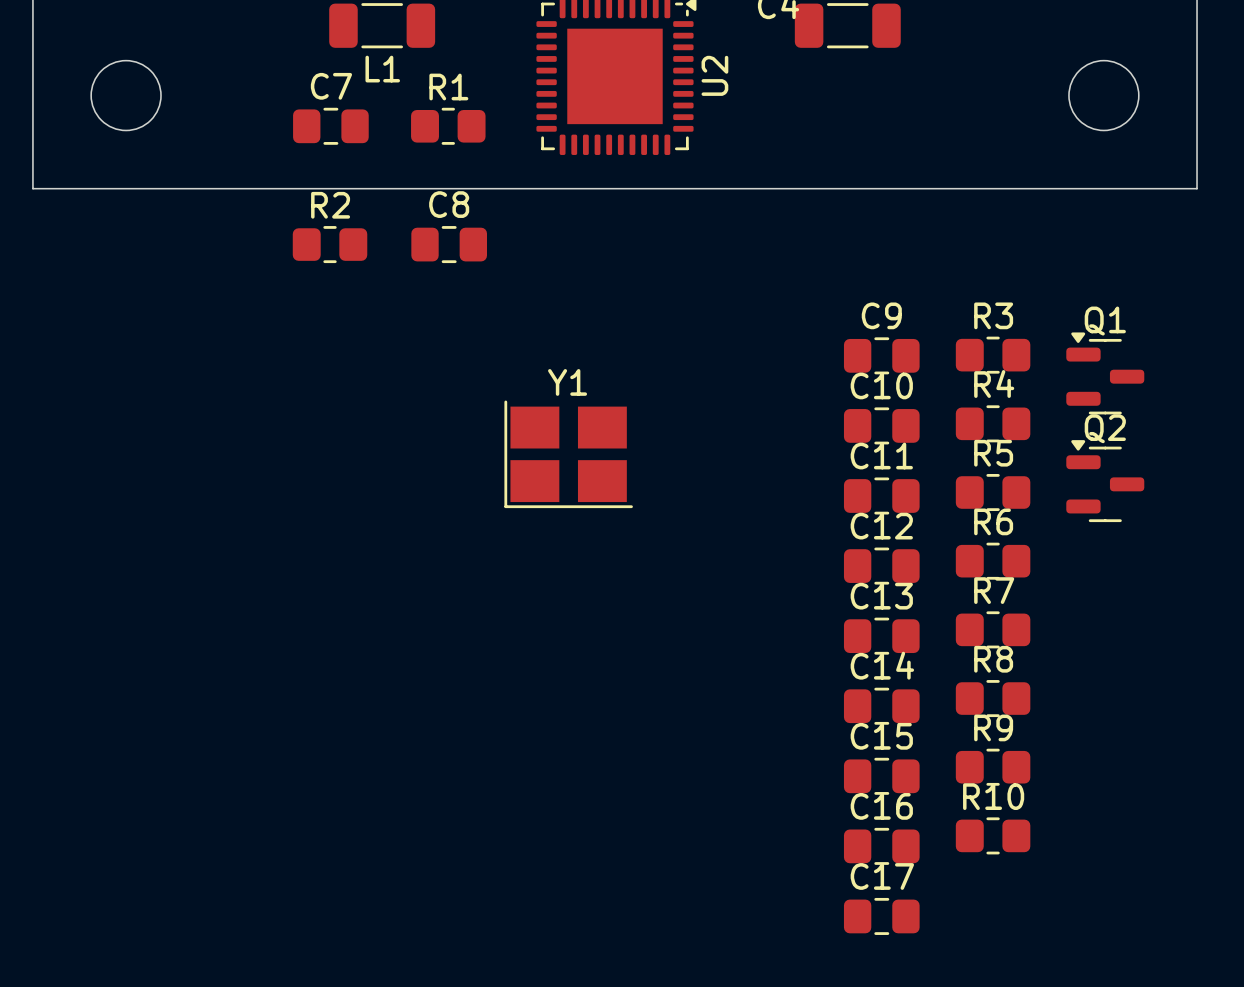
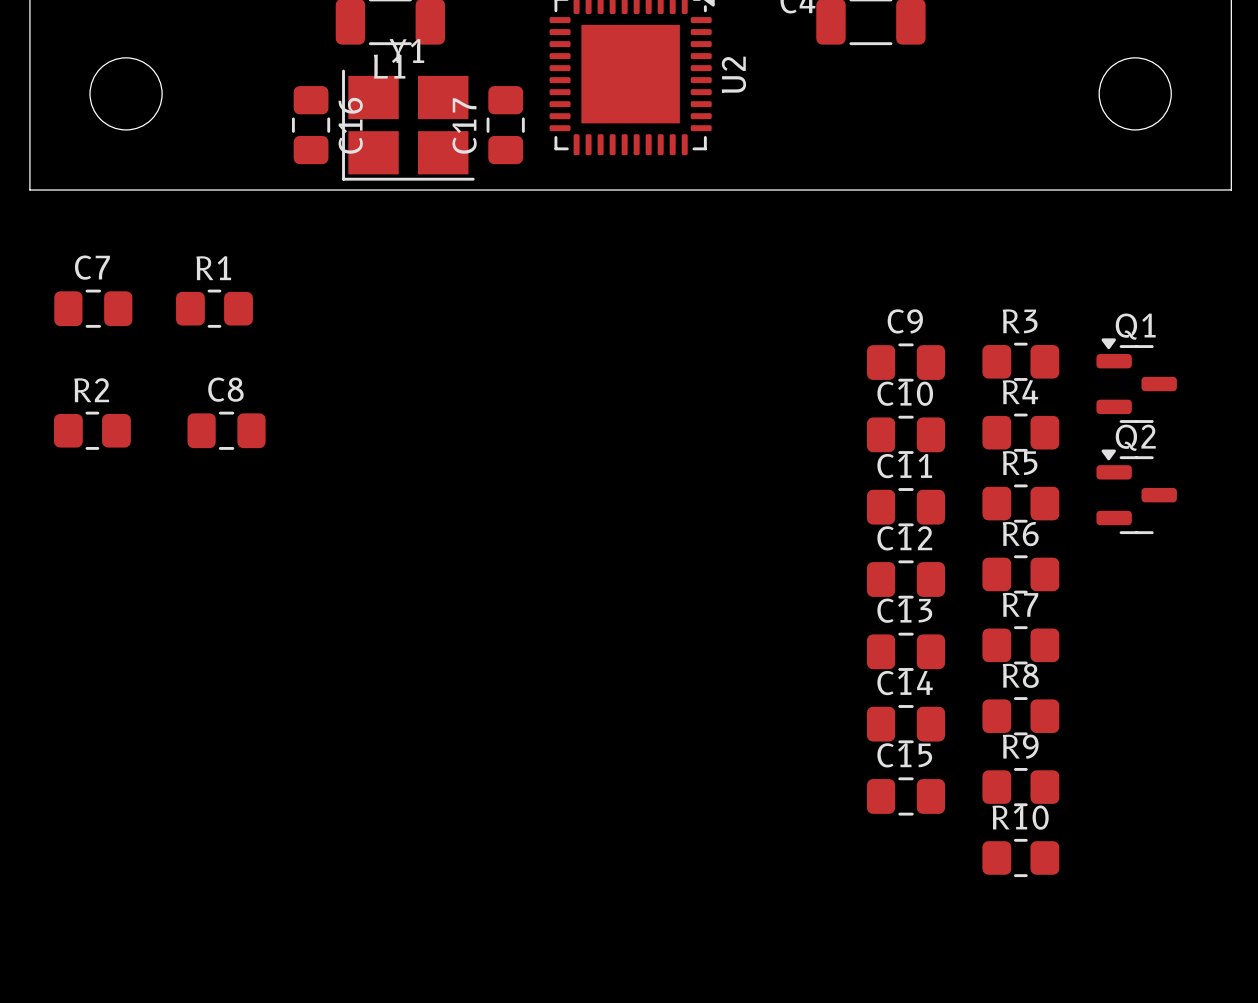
C7 position: (330, 126) -> (93, 308)
R1 position: (448, 126) -> (214, 308)
R2 position: (330, 244) -> (92, 430)
C8 position: (449, 244) -> (226, 430)
Y1 position: (568, 454) -> (408, 125)
C16 rotation: 0° (881, 846) -> 90° clockwise (311, 125)
C16 position: (881, 846) -> (311, 125)
C17 name position: C17 (882, 876) -> C17 (464, 126)
C17 rotation: 0° (881, 916) -> 90° clockwise (505, 125)
C17 position: (881, 916) -> (505, 125)

